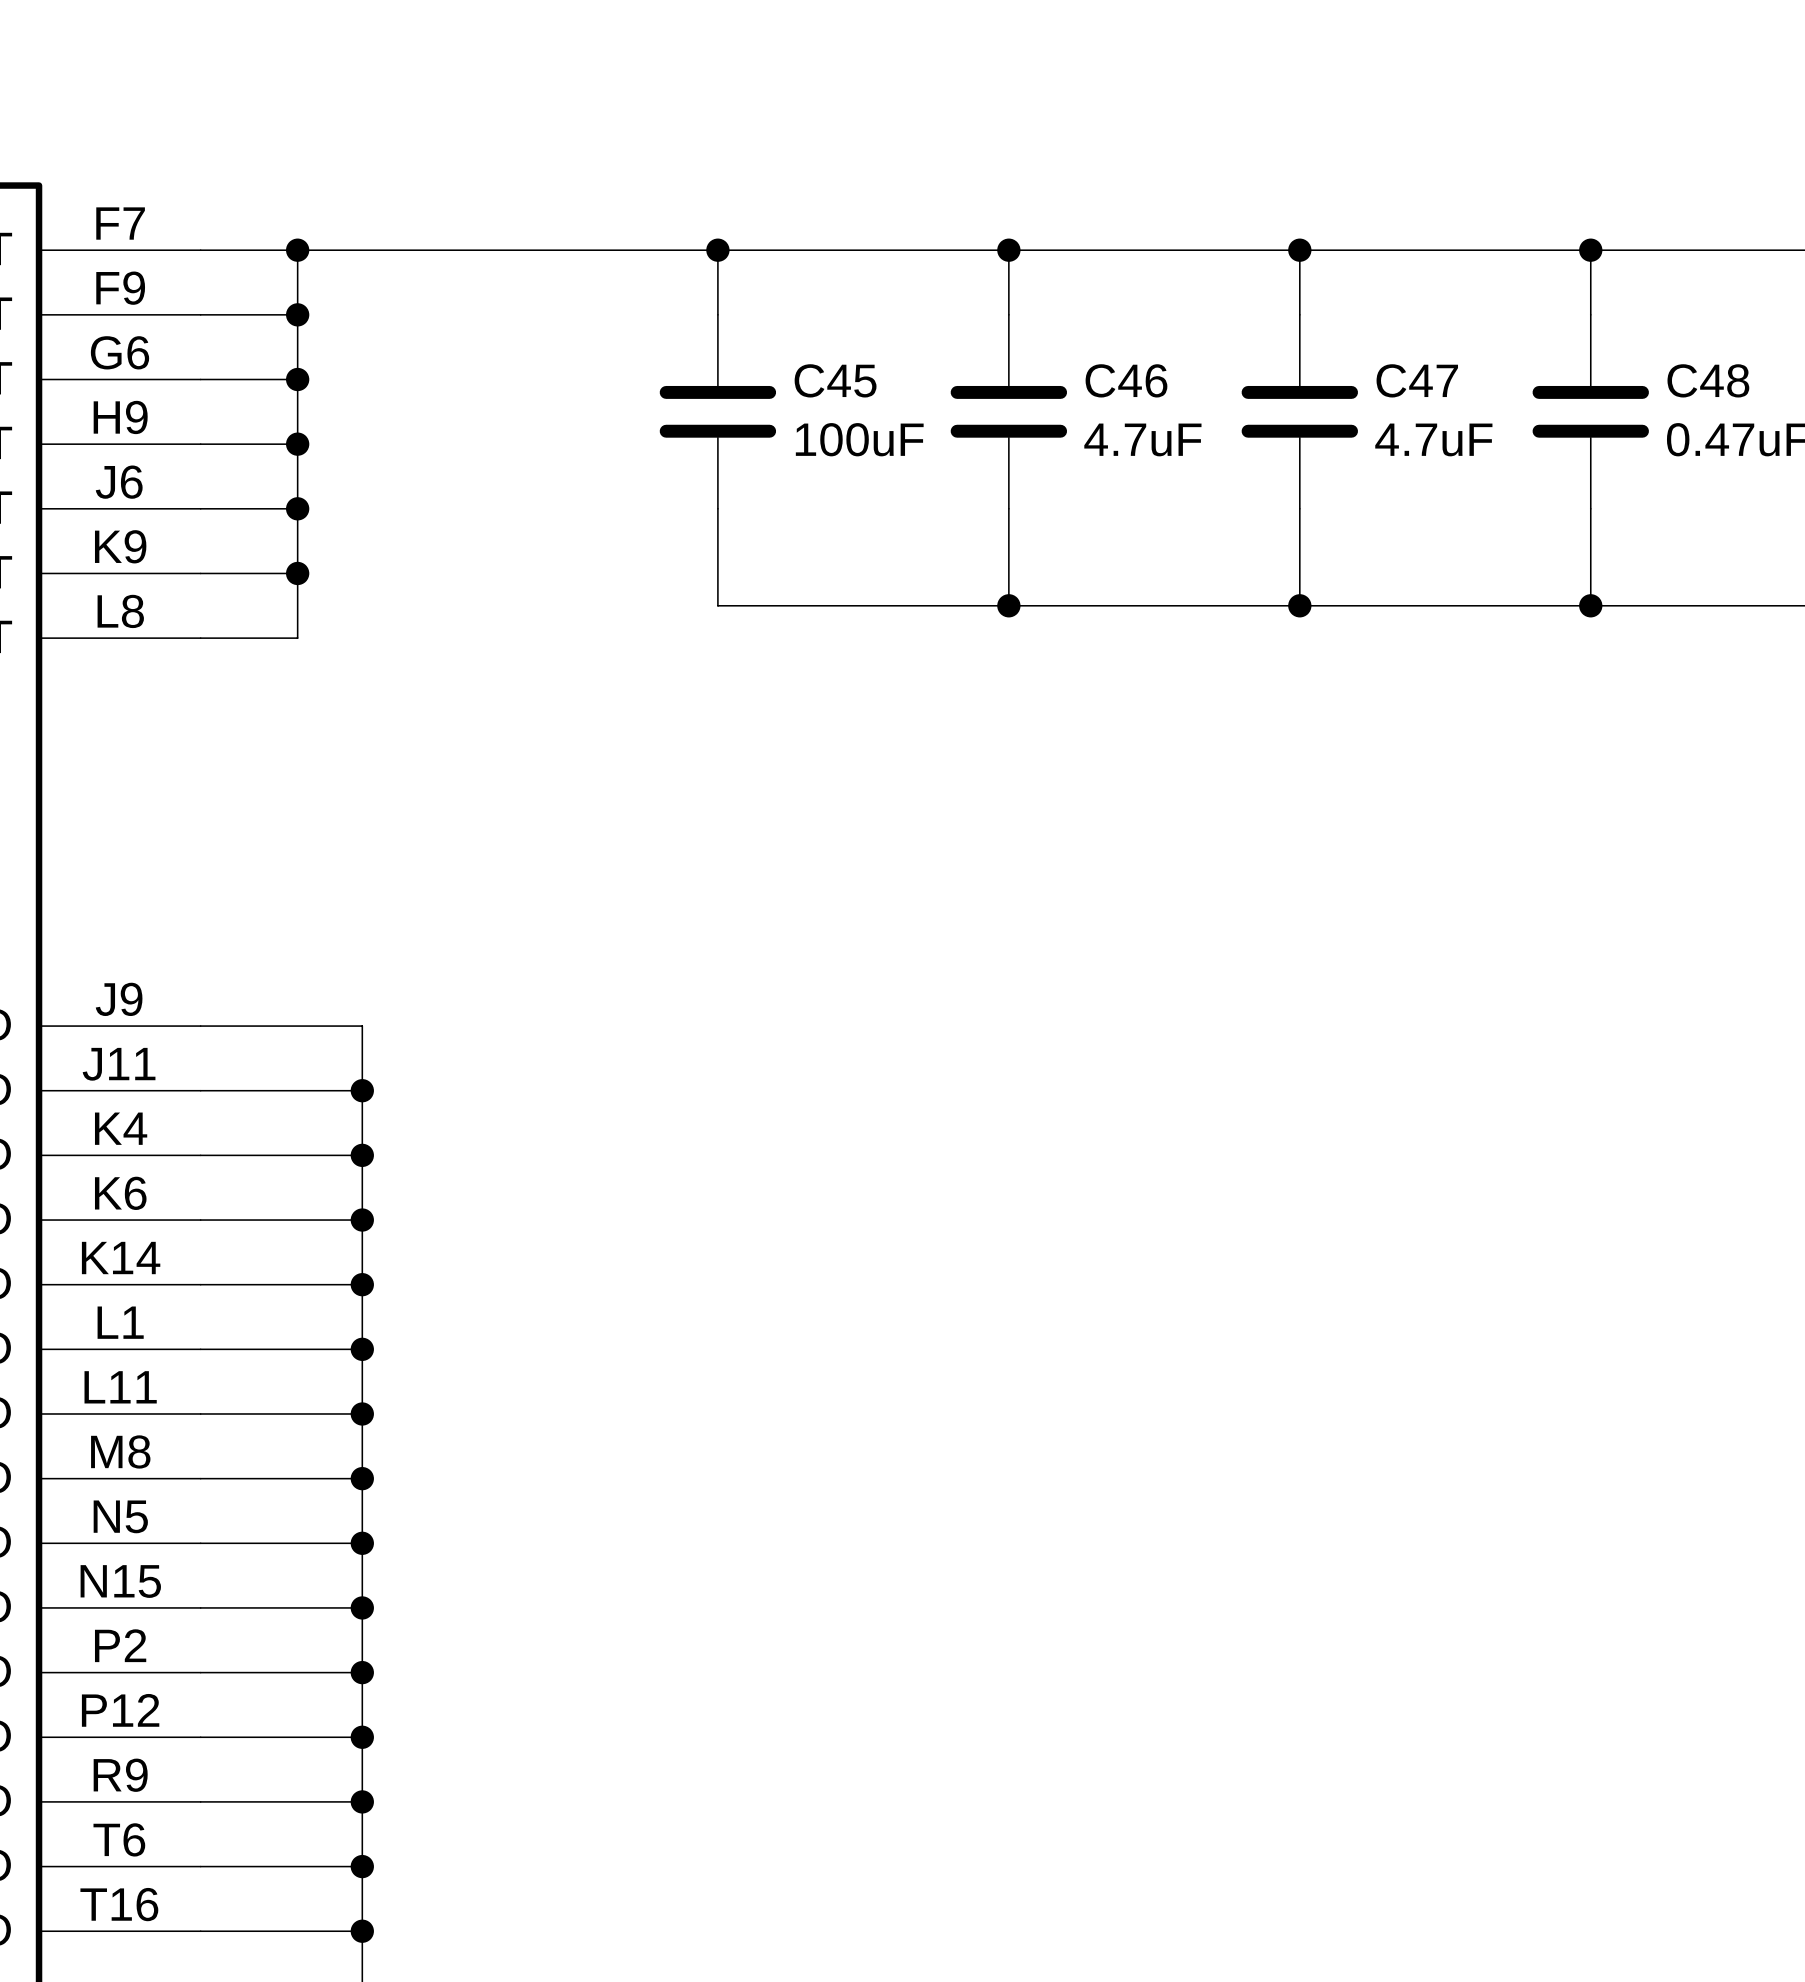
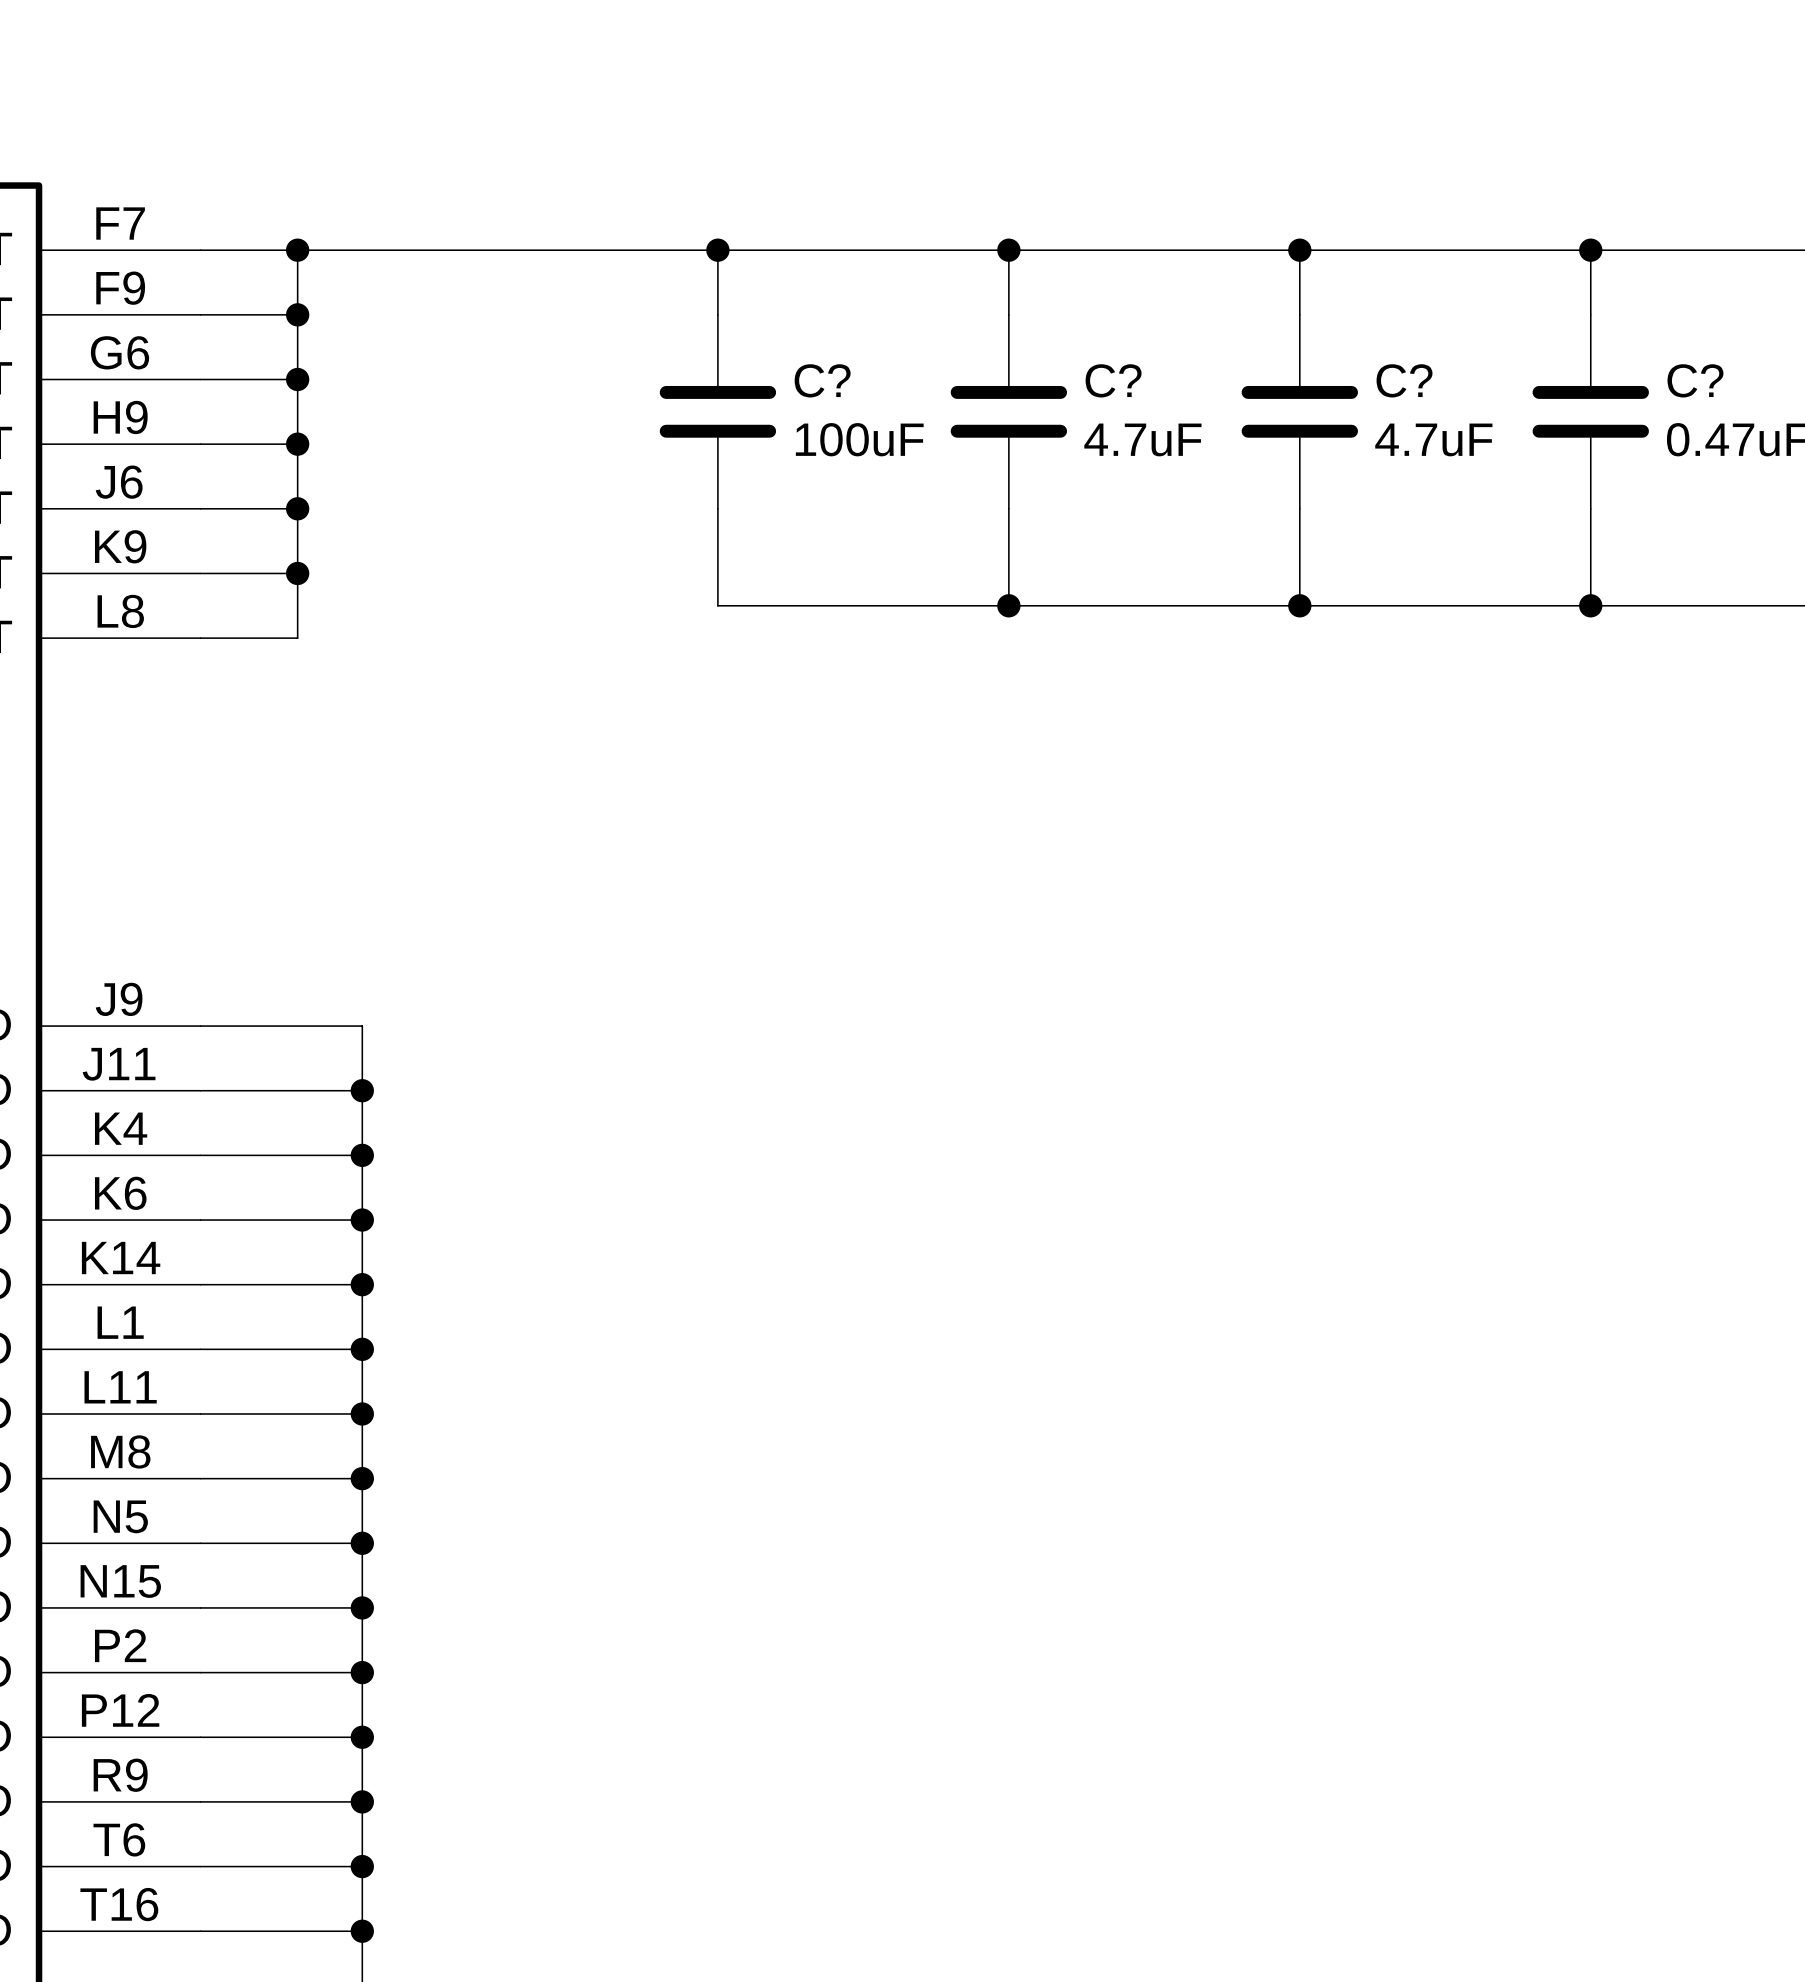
C45 name: C45 (835, 380) -> C? (822, 380)
C46 name: C46 (1126, 380) -> C? (1113, 380)
C47 name: C47 (1417, 380) -> C? (1404, 380)
C48 name: C48 (1708, 380) -> C? (1695, 380)

